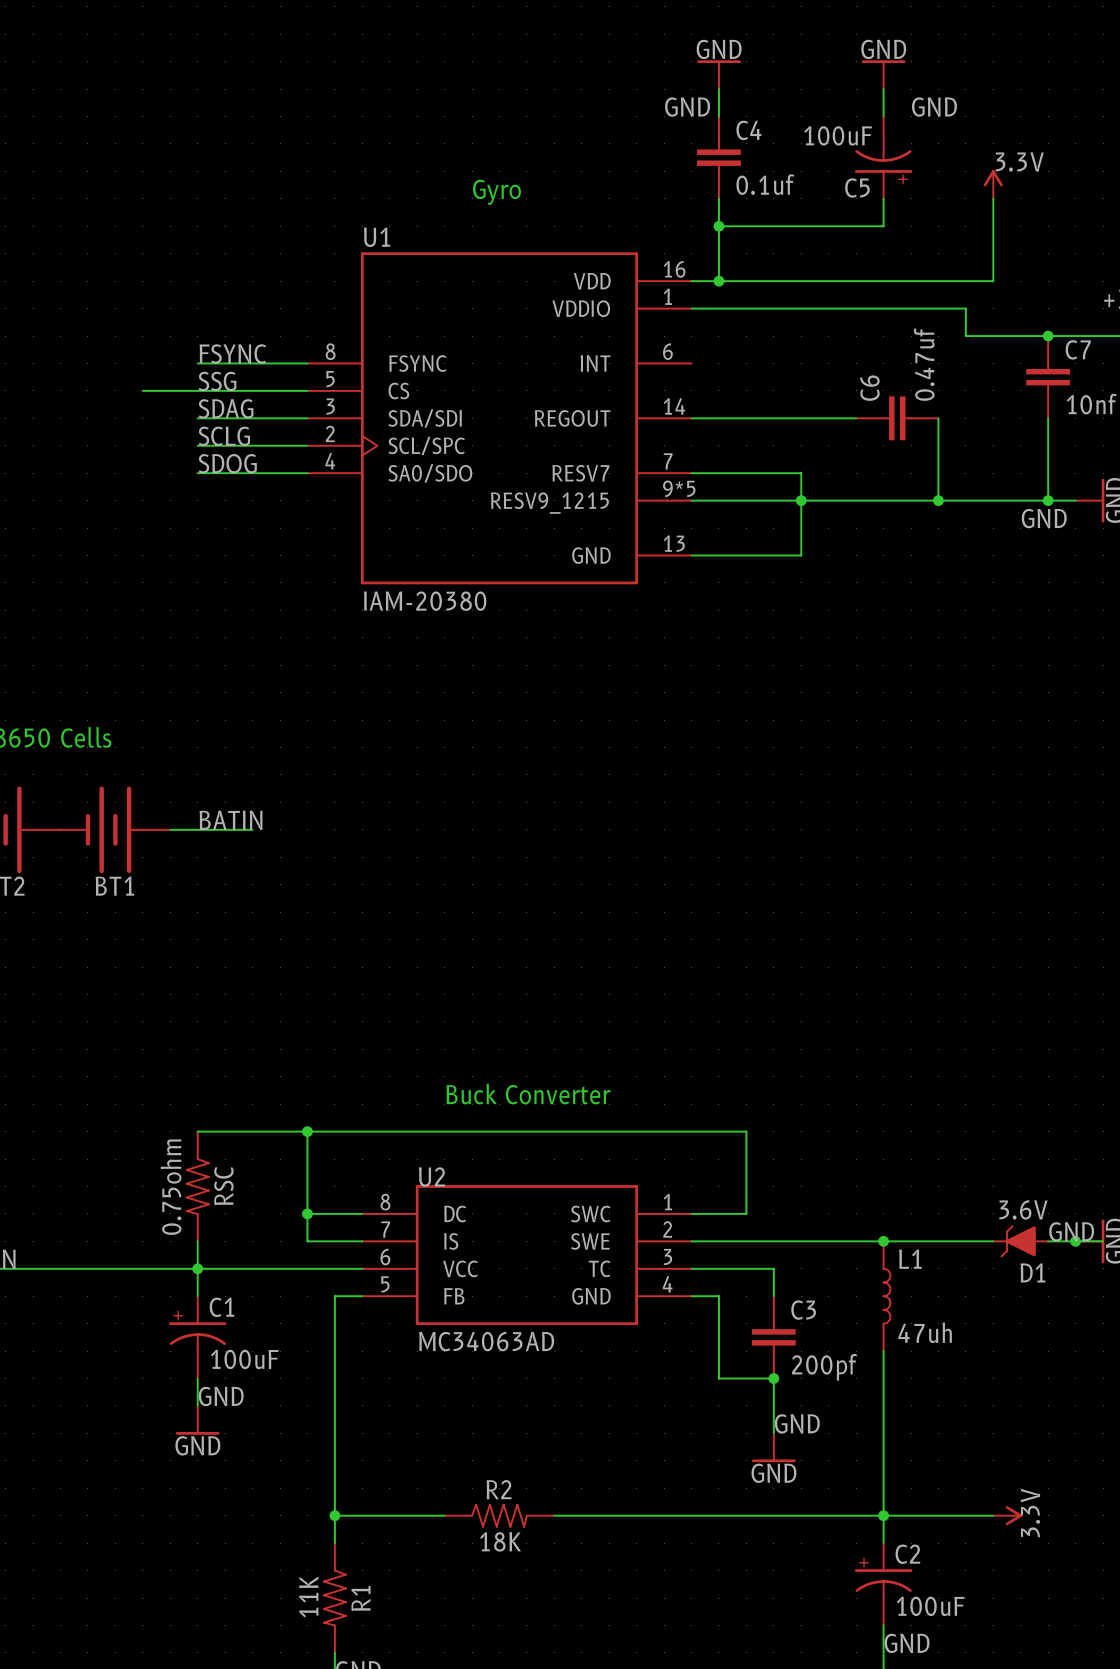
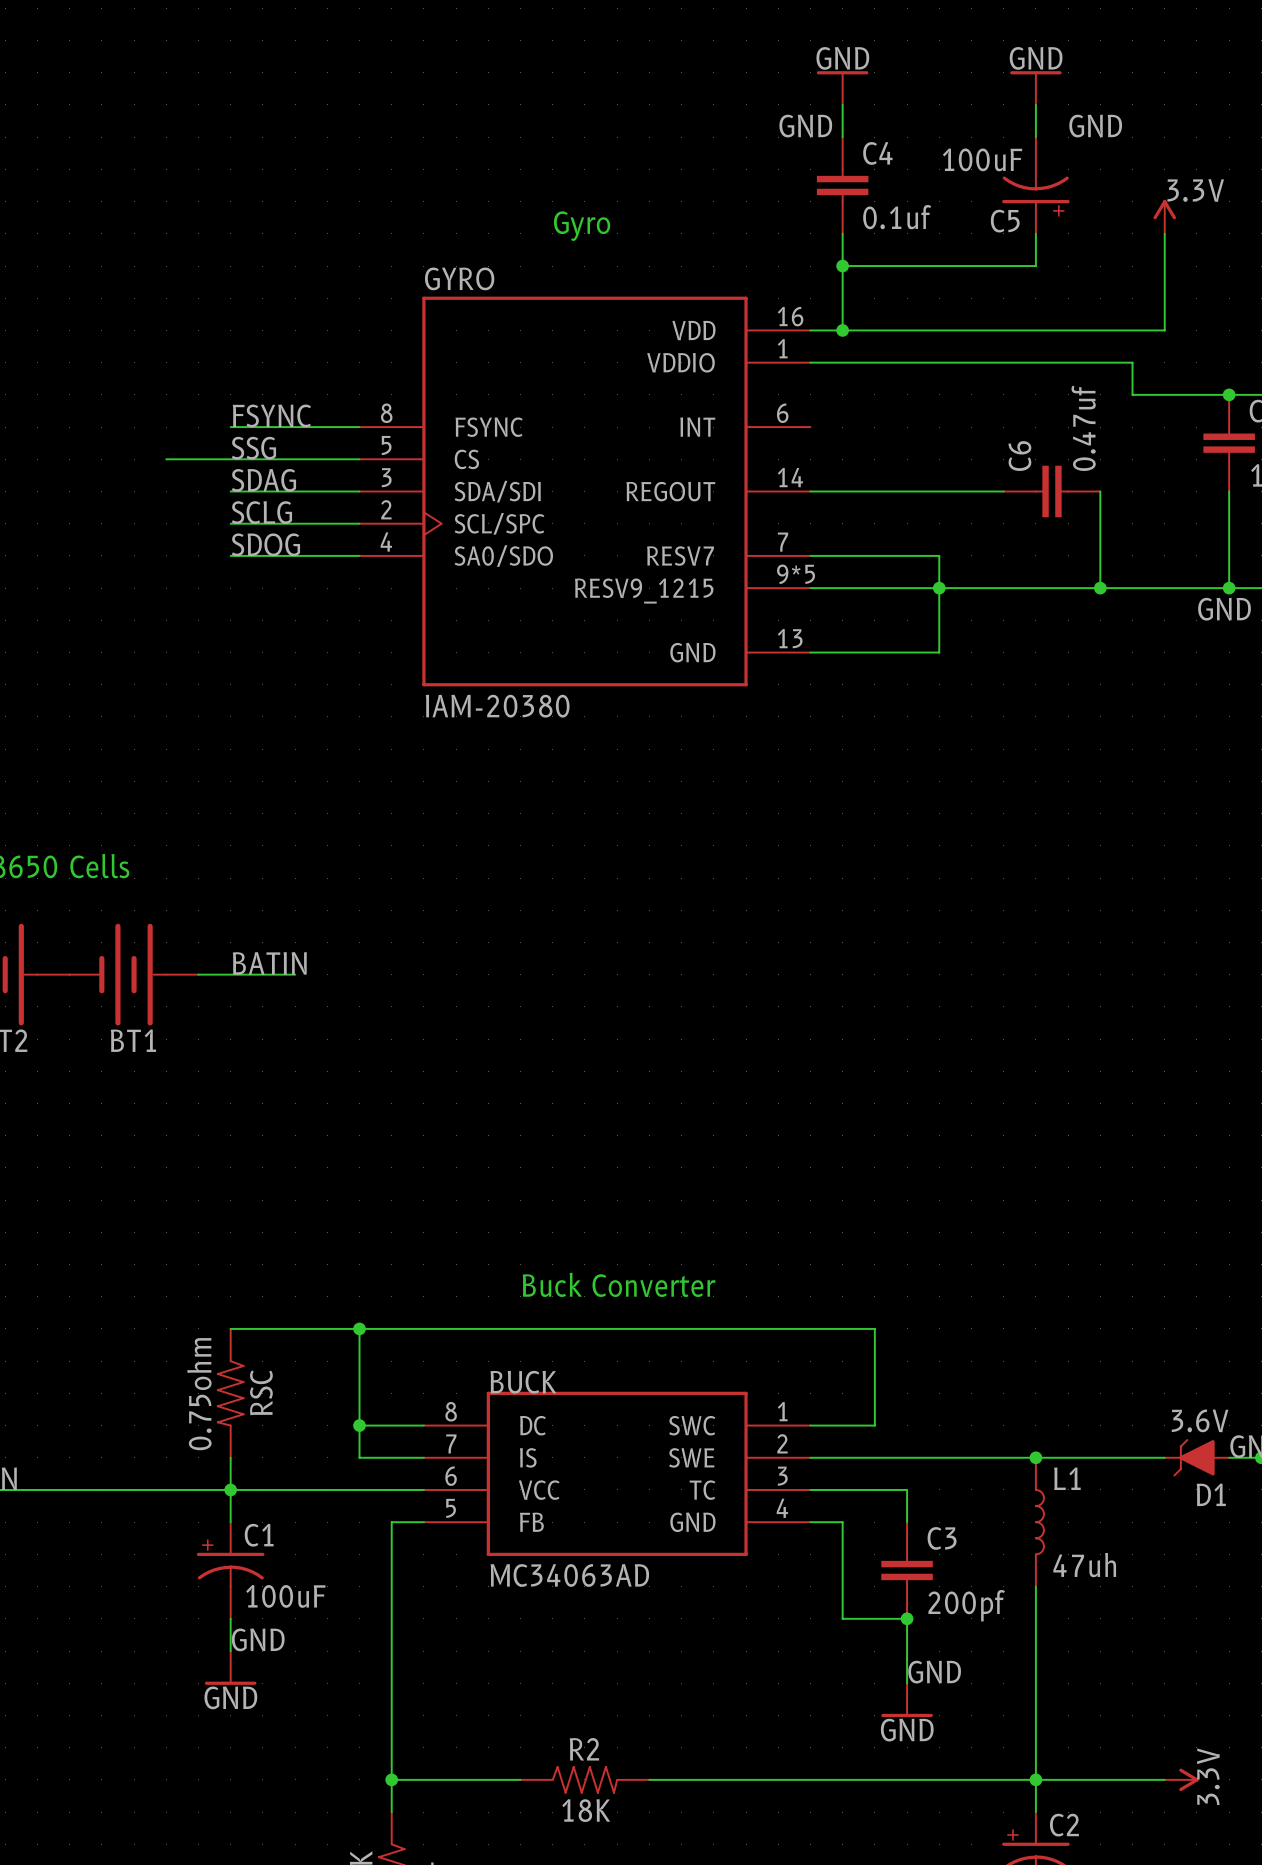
U1 name: U1 (377, 237) -> GYRO (459, 278)
U2 name: U2 (432, 1176) -> BUCK (523, 1382)

